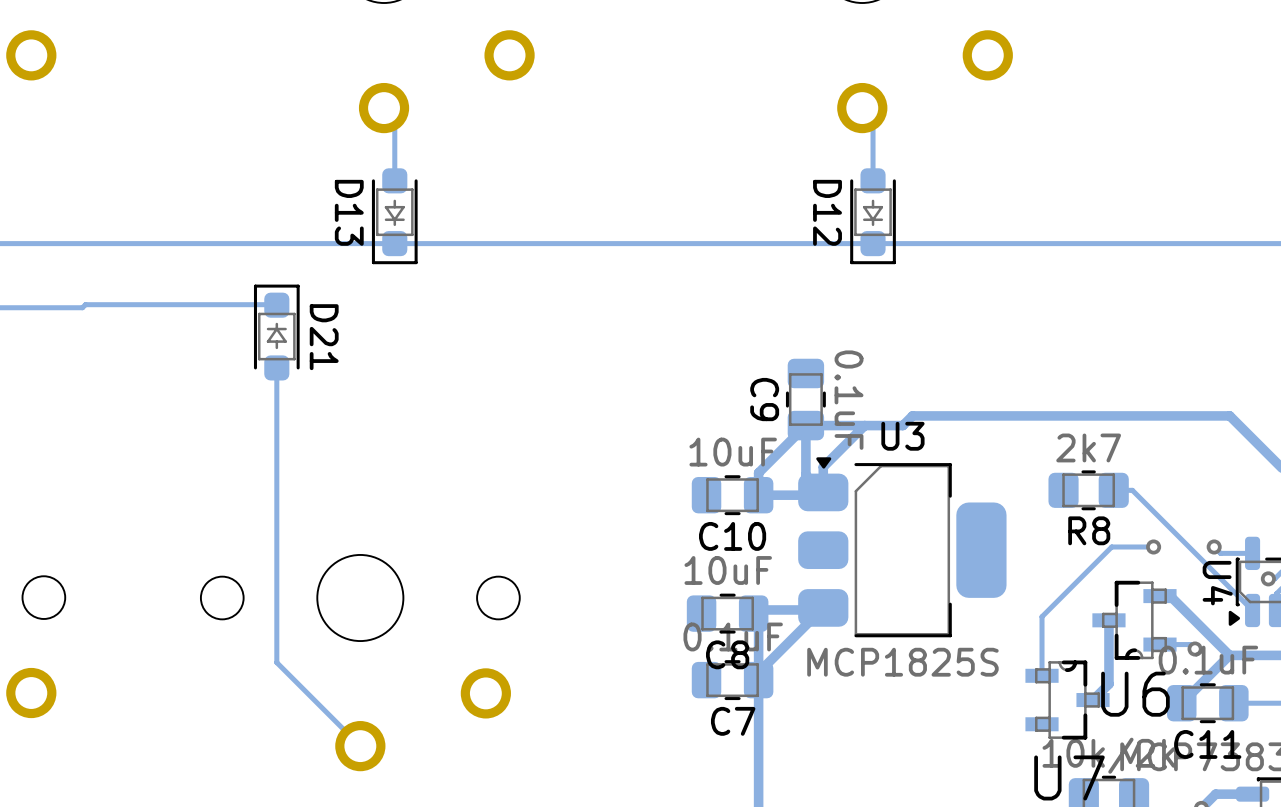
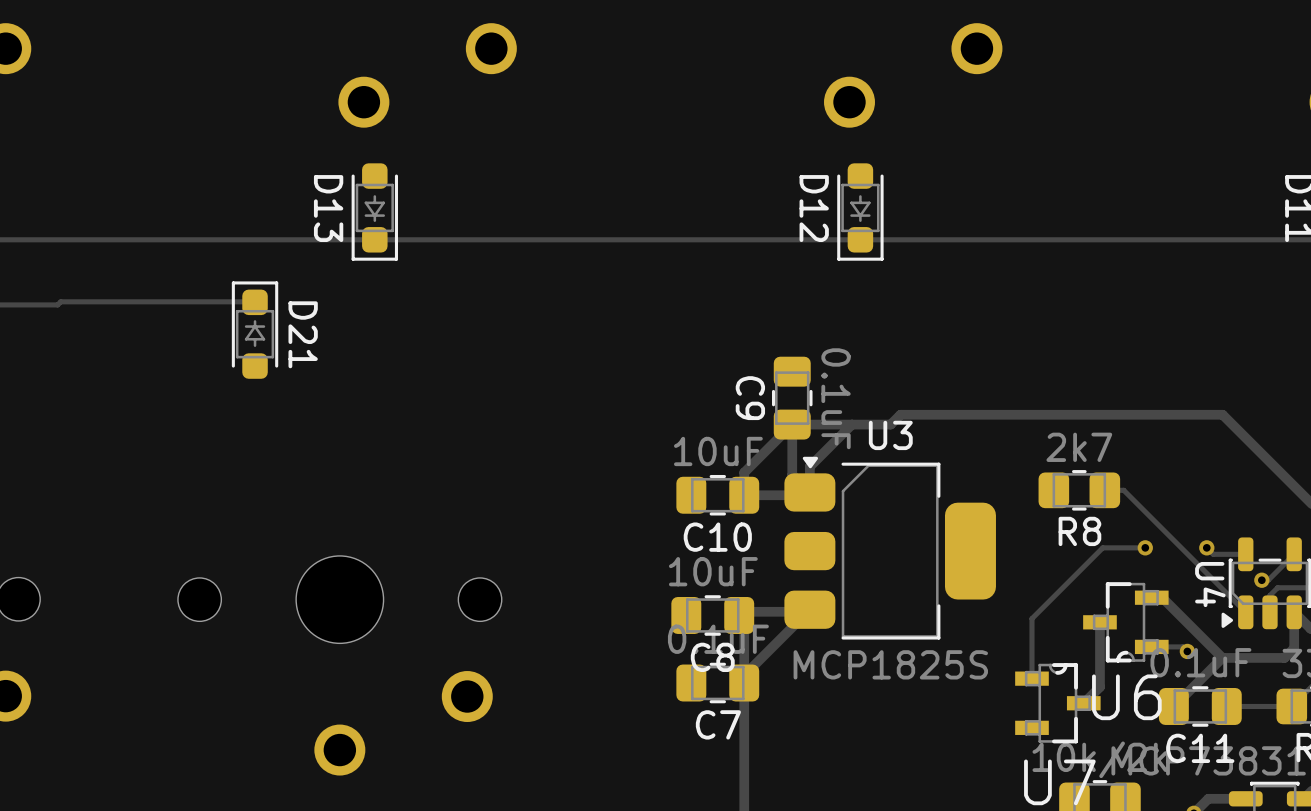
track: (384, 108) (394, 118) (394, 180) -> none
track: (862, 108) (873, 118) (873, 180) -> none
track: (276, 367) (276, 662) (360, 746) -> none

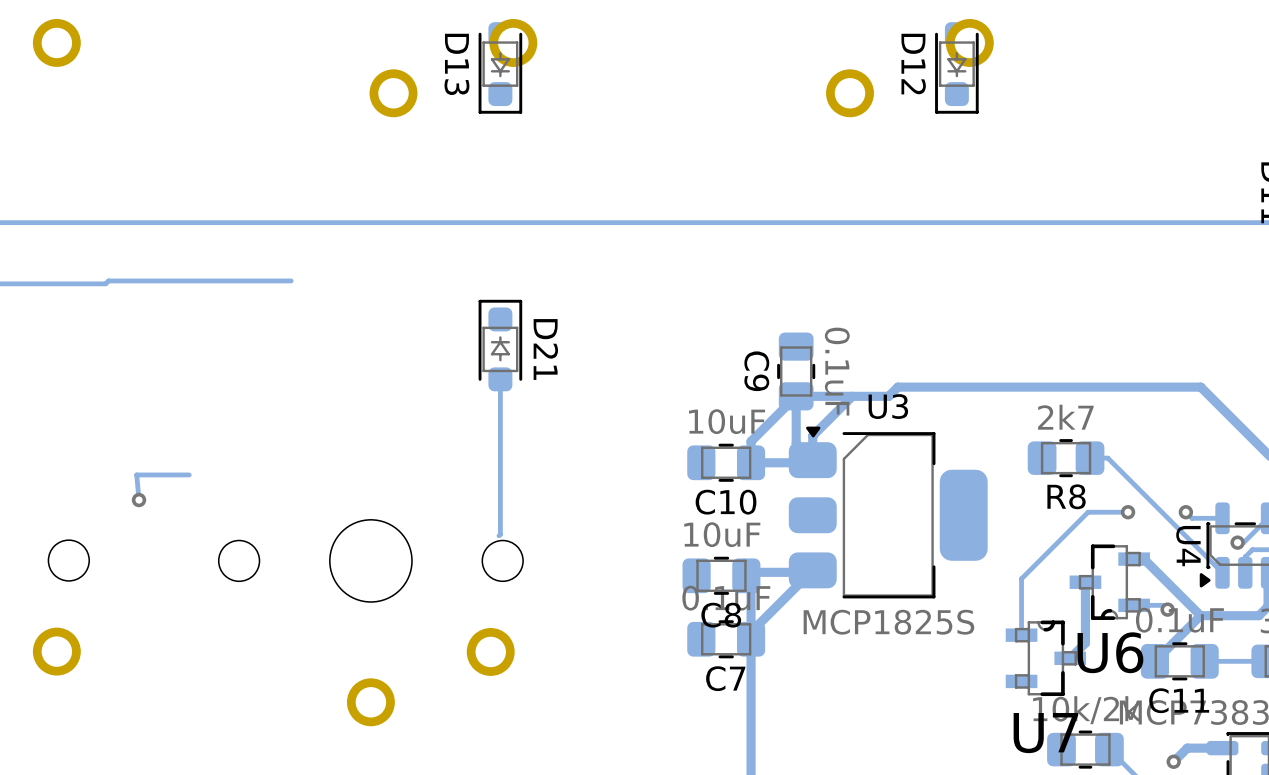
D13 position: (374, 212) -> (500, 67)
D12 position: (860, 212) -> (956, 67)
D21 position: (255, 330) -> (500, 345)
track: none -> (500, 379) (498, 535)
track: none -> (189, 474) (136, 474) (139, 500)
via: none -> (139, 500)

